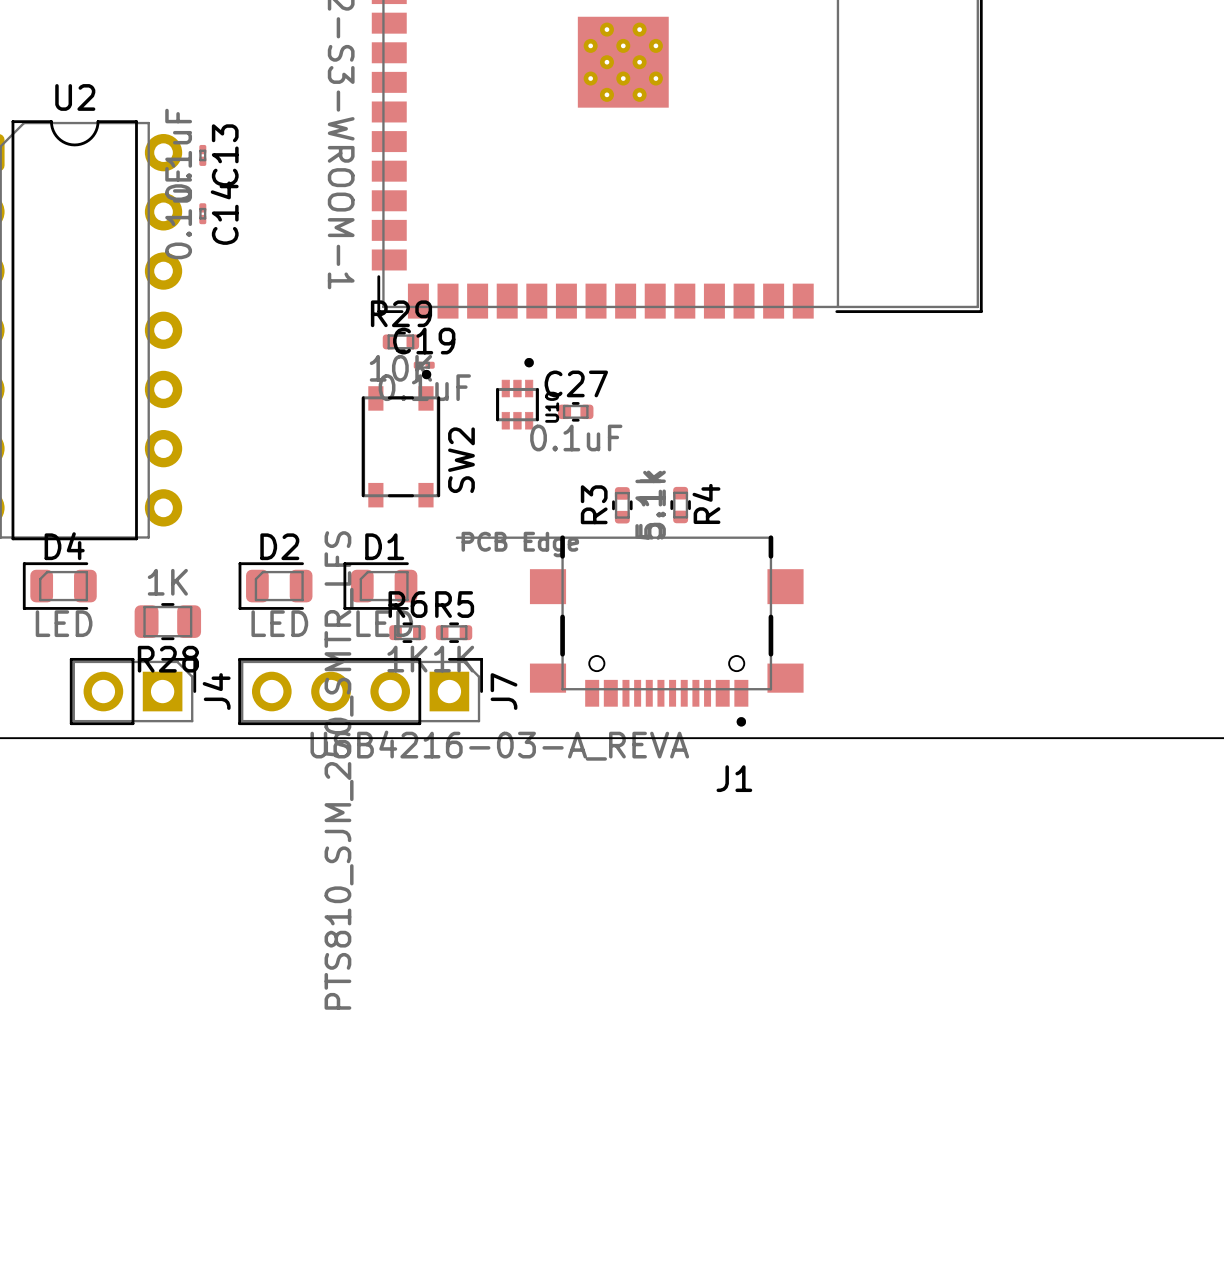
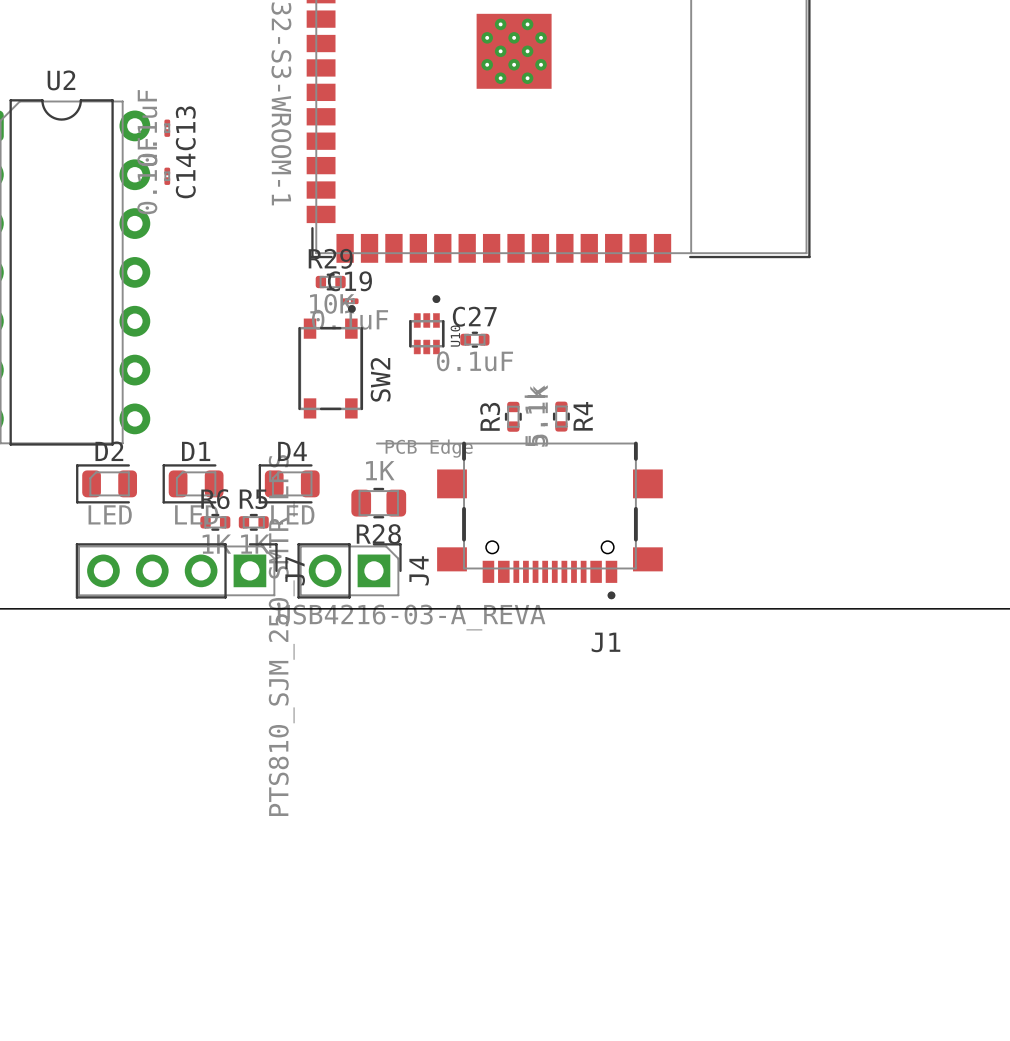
D4 position: (59, 586) -> (289, 483)
D2 position: (275, 586) -> (106, 483)
D1 position: (380, 586) -> (193, 483)
R28 position: (167, 621) -> (378, 503)
R6 position: (407, 632) -> (215, 522)
R5 position: (454, 632) -> (253, 522)
J4 position: (132, 691) -> (349, 570)
J7 position: (360, 691) -> (176, 570)

